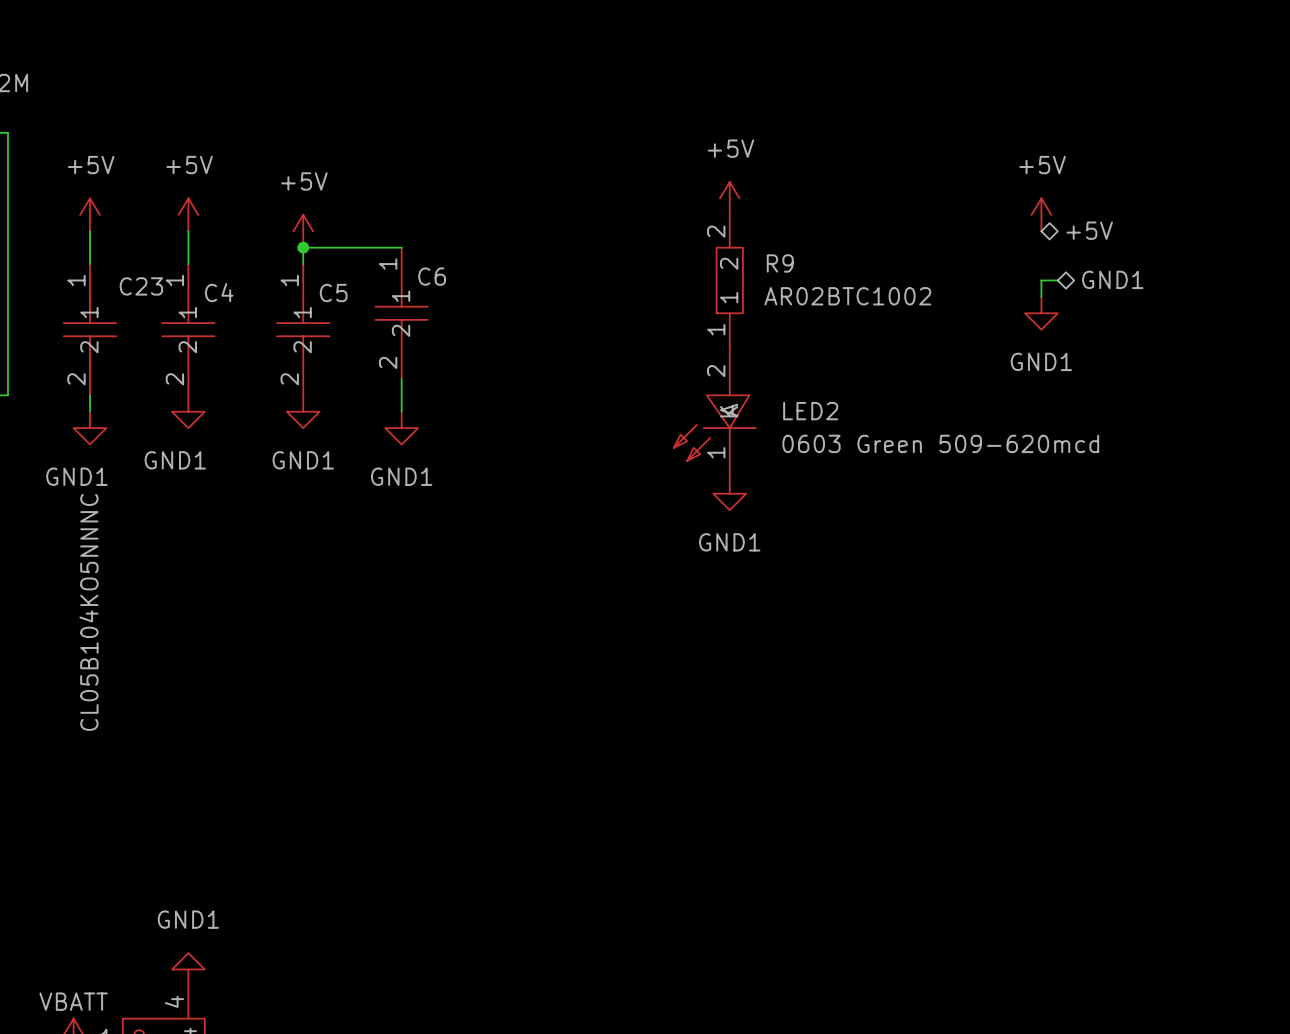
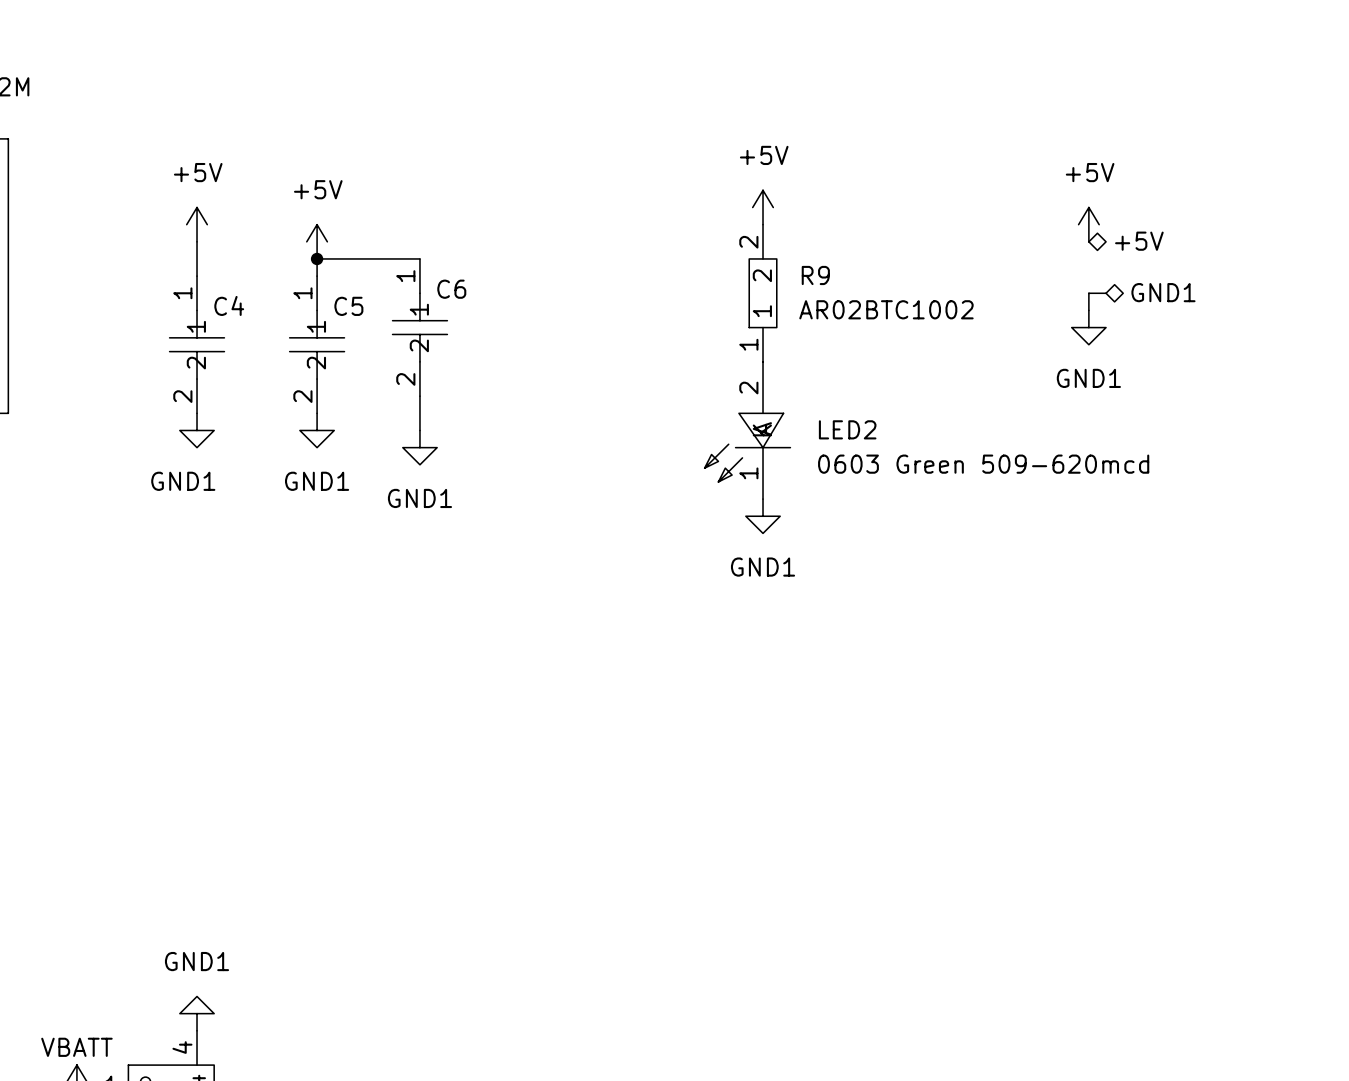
power symbol: +5V (89, 214) -> none
wire: (89, 231) (89, 264) -> none
C23: CL05B104KO5NNNC (89, 329) -> none
wire: (89, 395) (89, 411) -> none
power symbol: GND1 (89, 428) -> none

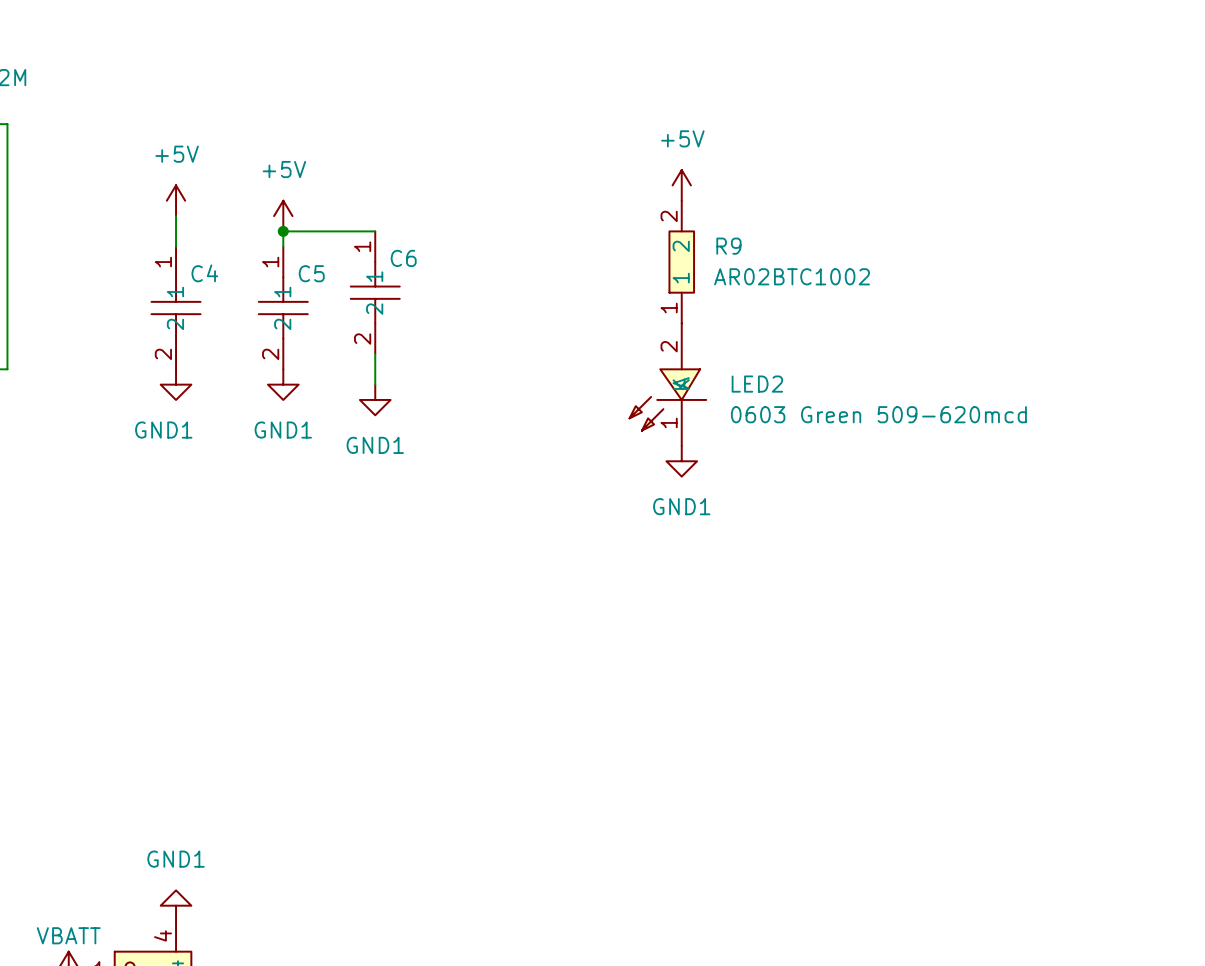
power symbol: +5V (1088, 224) -> none
hierarchical label: +5V (1139, 241) -> none
hierarchical label: GND1 (1163, 292) -> none
wire: (1106, 293) (1088, 293) (1088, 310) -> none
power symbol: GND1 (1088, 327) -> none

